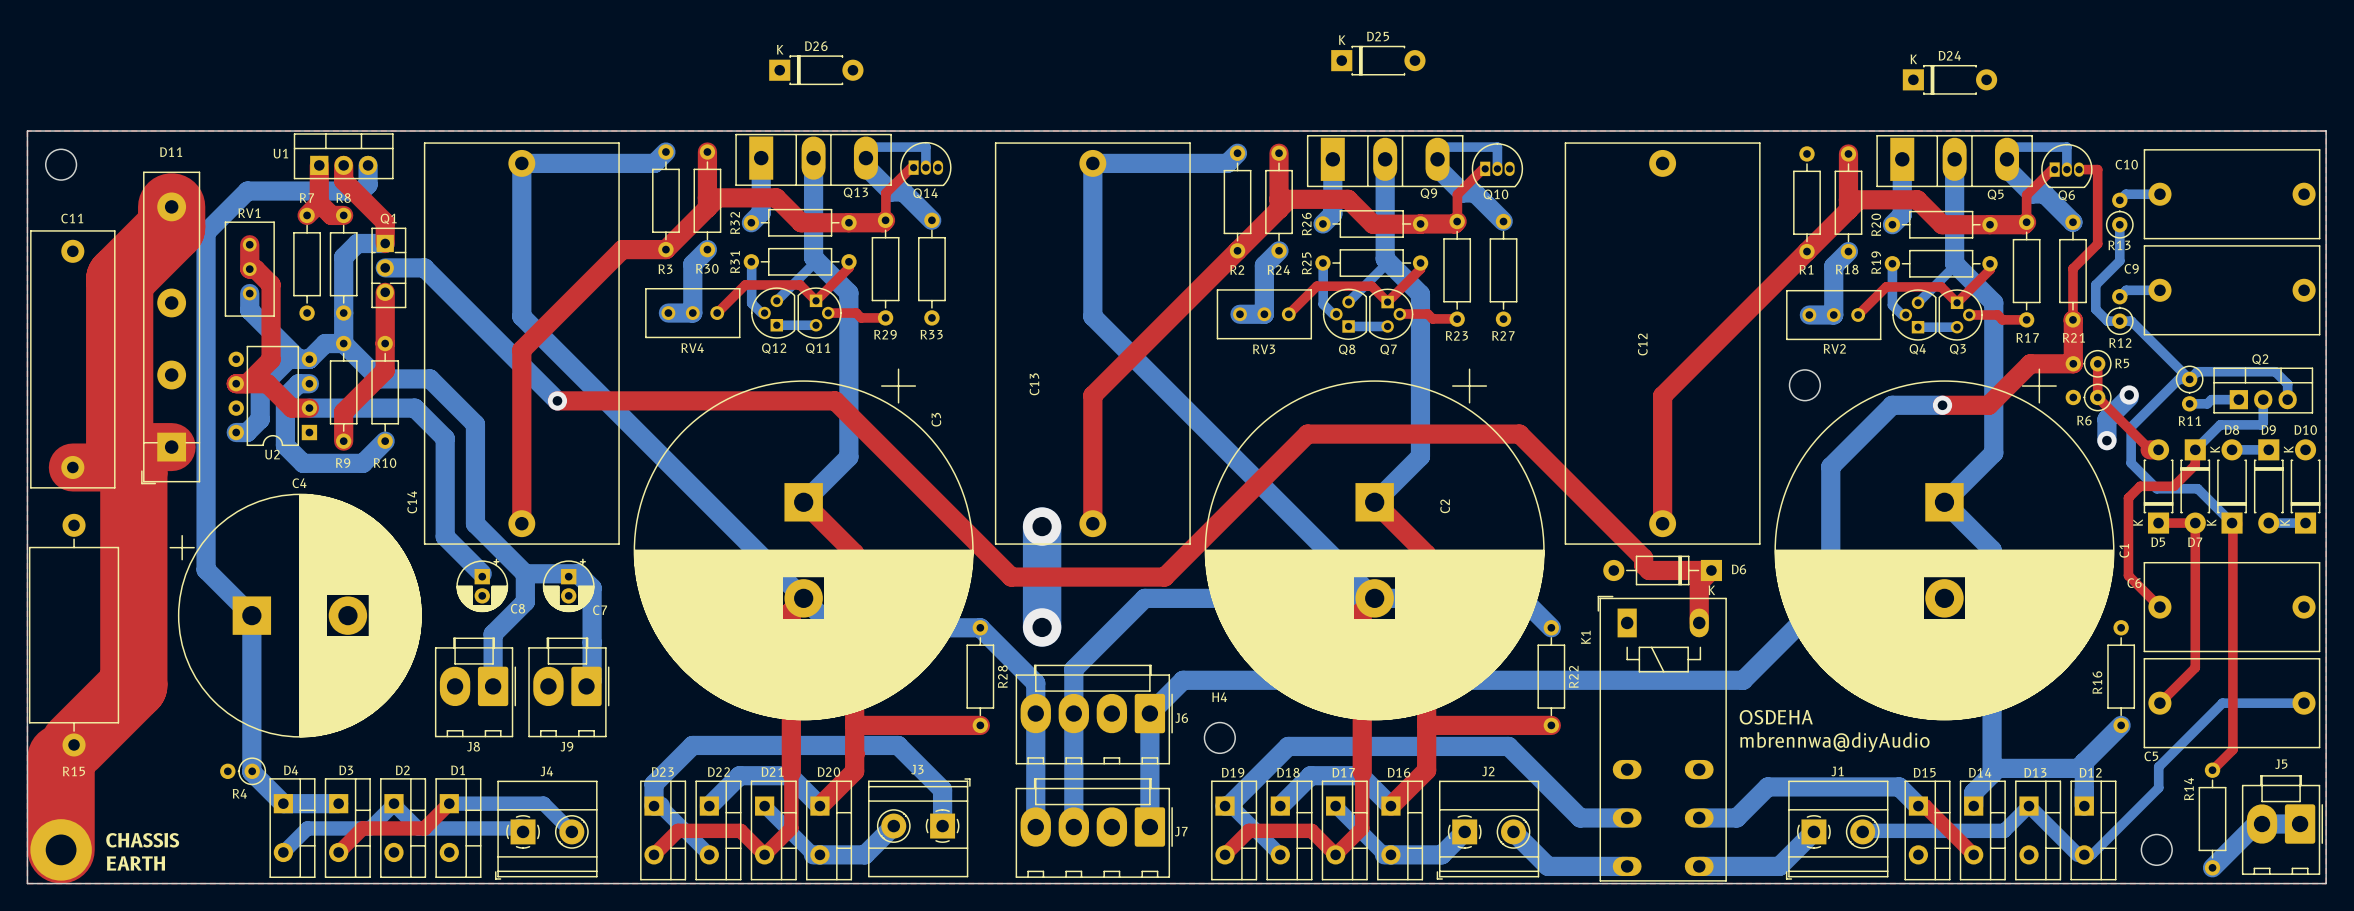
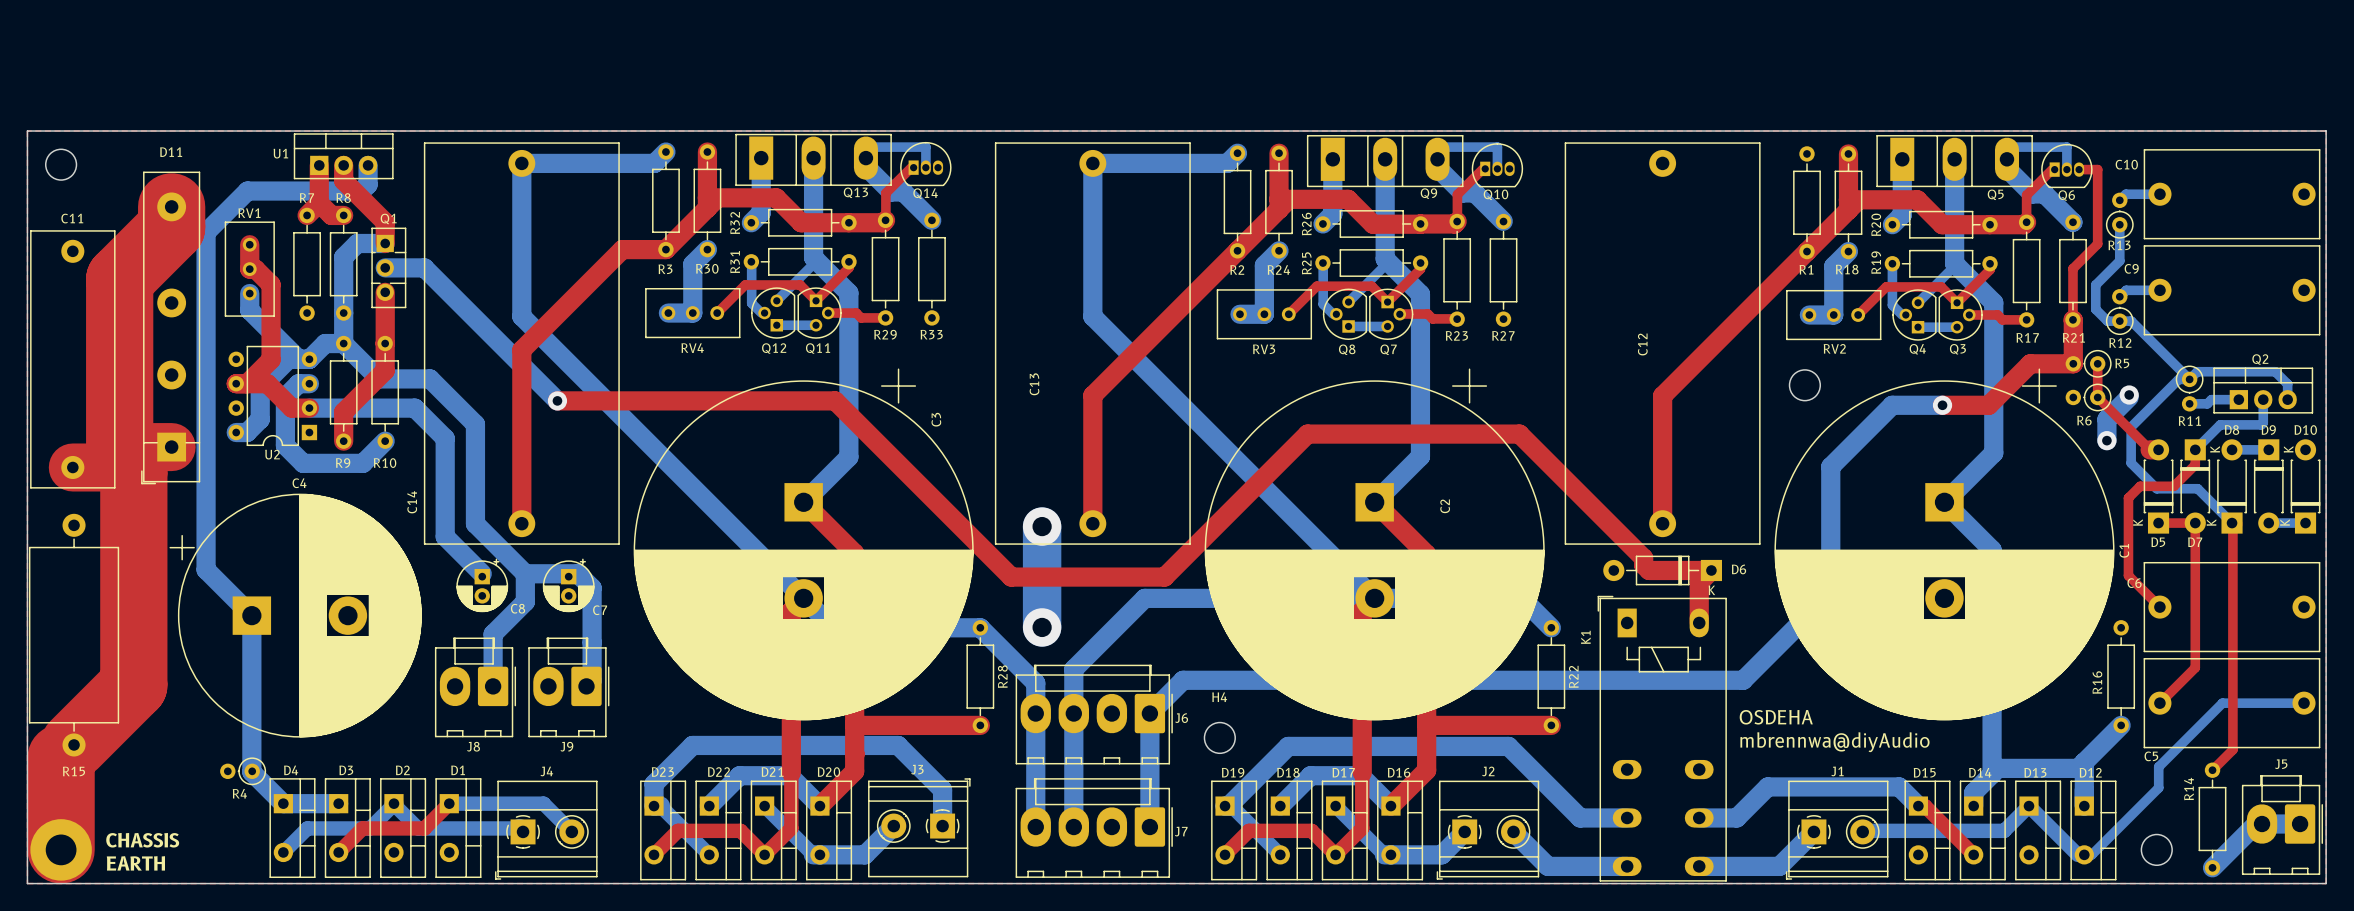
D25: (1378, 60) -> none
D26: (816, 70) -> none
D24: (1949, 79) -> none

